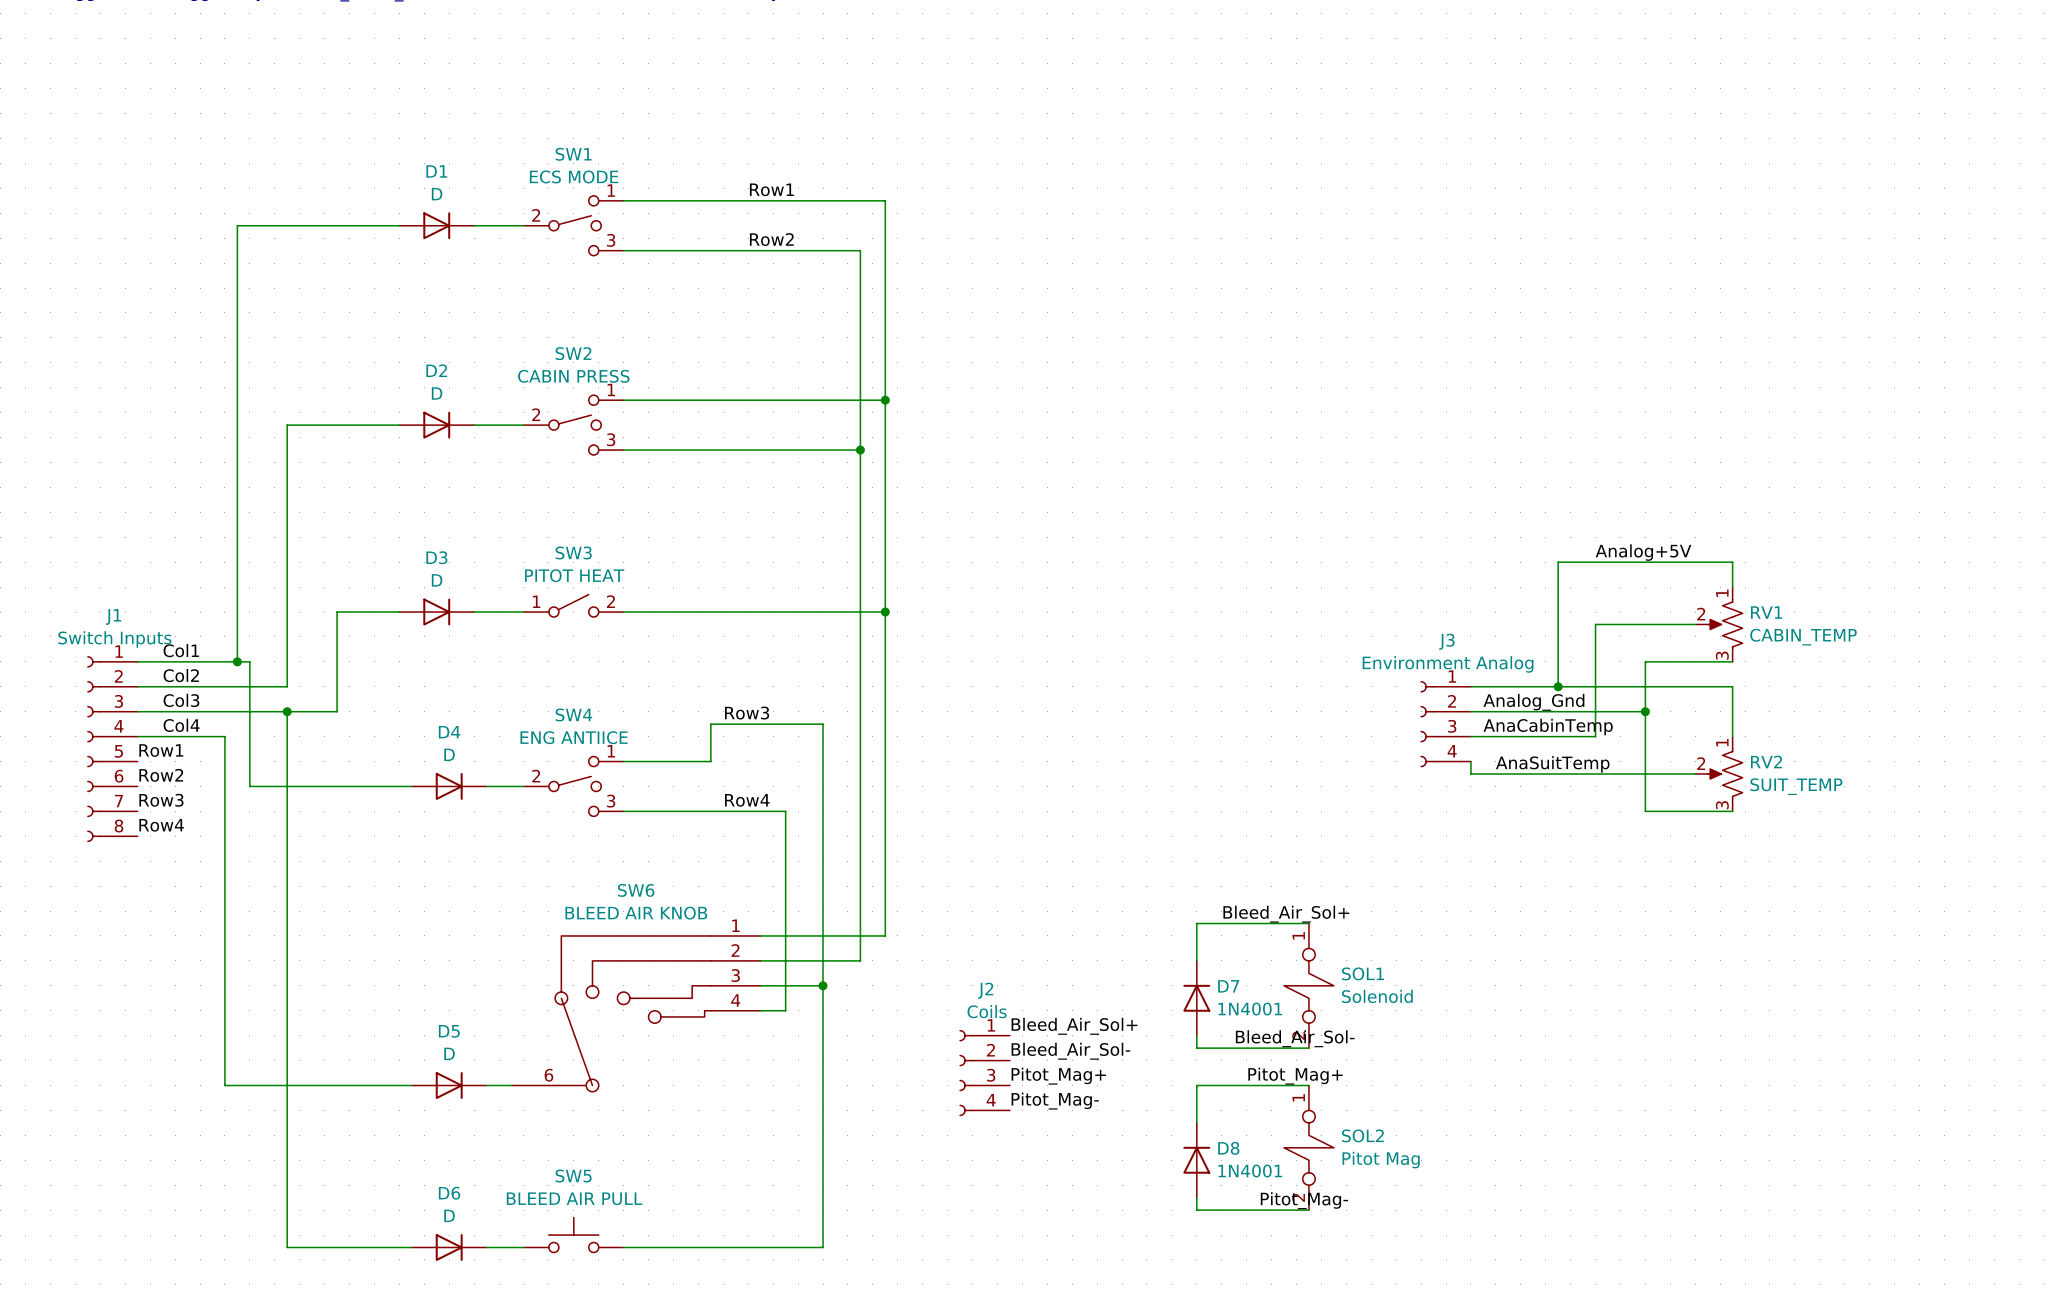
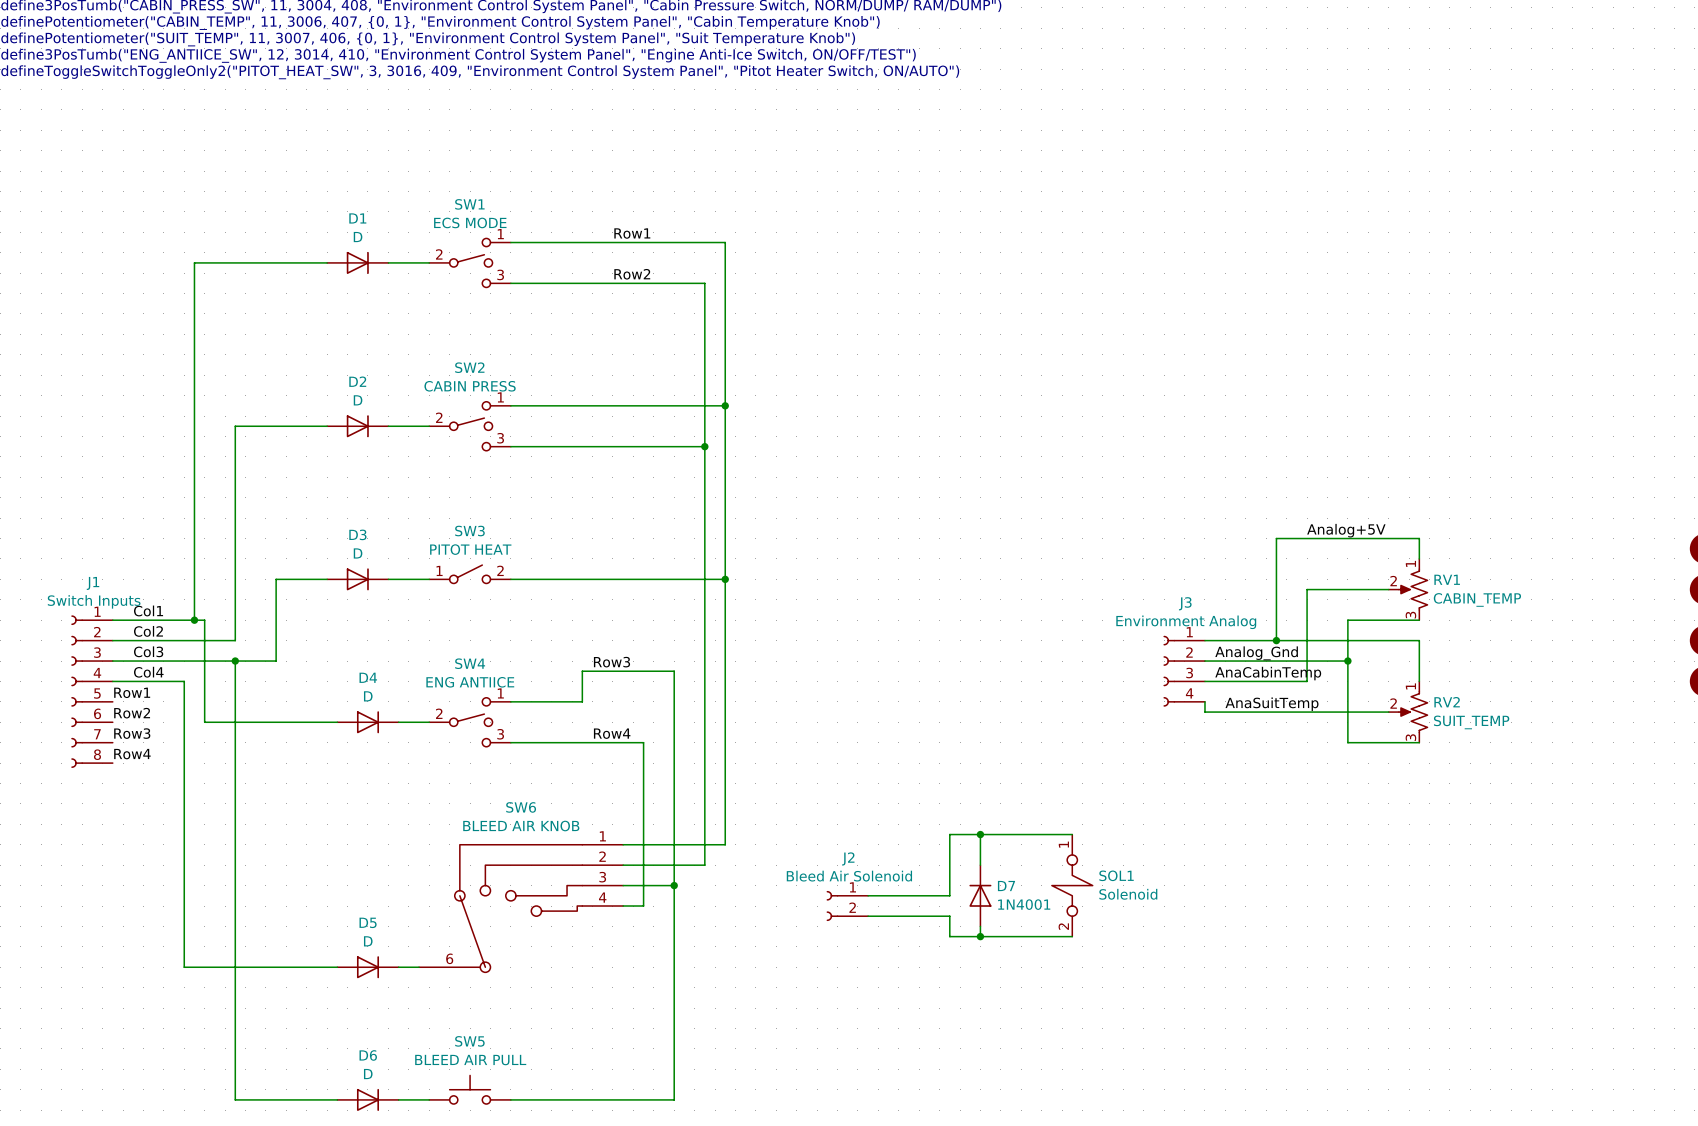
label: Bleed_Air_Sol+ (1286, 914) -> none
wire: none -> (980, 834) (949, 834) (949, 895) (868, 895)
junction: none -> (980, 834)
J2 name position: J2 (985, 990) -> J2 (848, 858)
J2 value: Coils (987, 1011) -> Bleed Air Solenoid (849, 876)
wire: none -> (868, 916) (949, 916) (949, 936) (980, 936)
label: Bleed_Air_Sol+ (1074, 1026) -> none
J2 symbol: [959, 1029, 1010, 1117] -> [826, 891, 869, 921]
label: Bleed_Air_Sol- (1295, 1038) -> none
junction: none -> (980, 936)
label: Bleed_Air_Sol- (1070, 1051) -> none
label: Pitot_Mag+ (1058, 1076) -> none
label: Pitot_Mag+ (1295, 1076) -> none
wire: (1308, 1085) (1196, 1085) (1196, 1122) -> none
label: Pitot_Mag- (1055, 1101) -> none
SOL2: Pitot Mag (1308, 1147) -> none
D8: 1N4001 (1196, 1160) -> none
wire: (1196, 1197) (1196, 1210) (1308, 1210) -> none
label: Pitot_Mag- (1304, 1200) -> none

